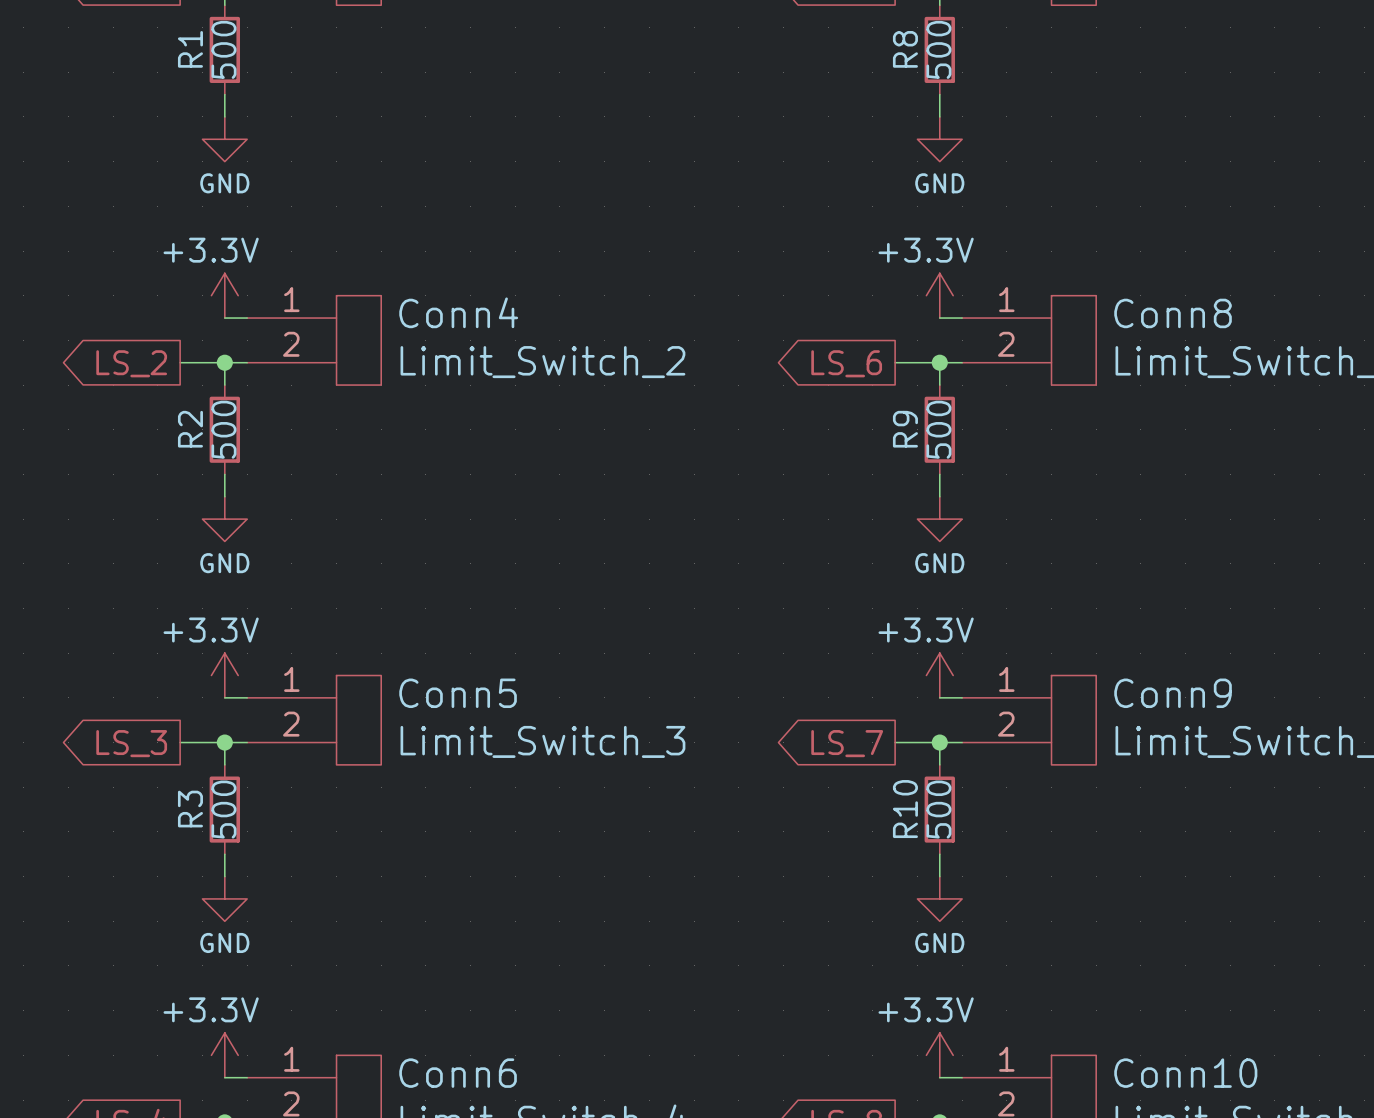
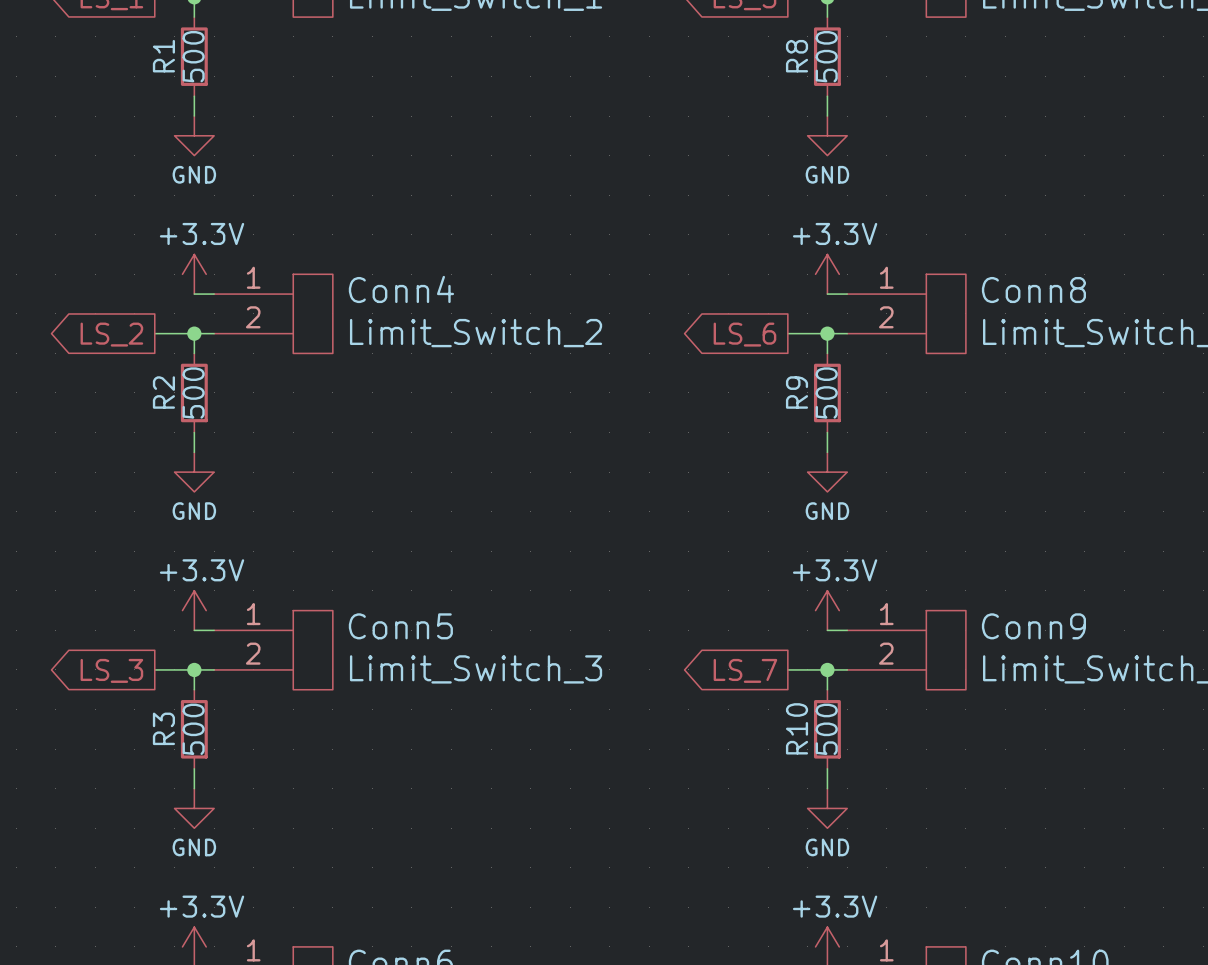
power symbol text position: +3.3V (211, 250) -> +3.3V (202, 233)
power symbol text position: +3.3V (926, 250) -> +3.3V (835, 233)
power symbol text position: +3.3V (211, 629) -> +3.3V (202, 570)
power symbol text position: +3.3V (926, 629) -> +3.3V (835, 570)
power symbol text position: +3.3V (211, 1009) -> +3.3V (202, 906)
power symbol text position: +3.3V (926, 1009) -> +3.3V (835, 906)

